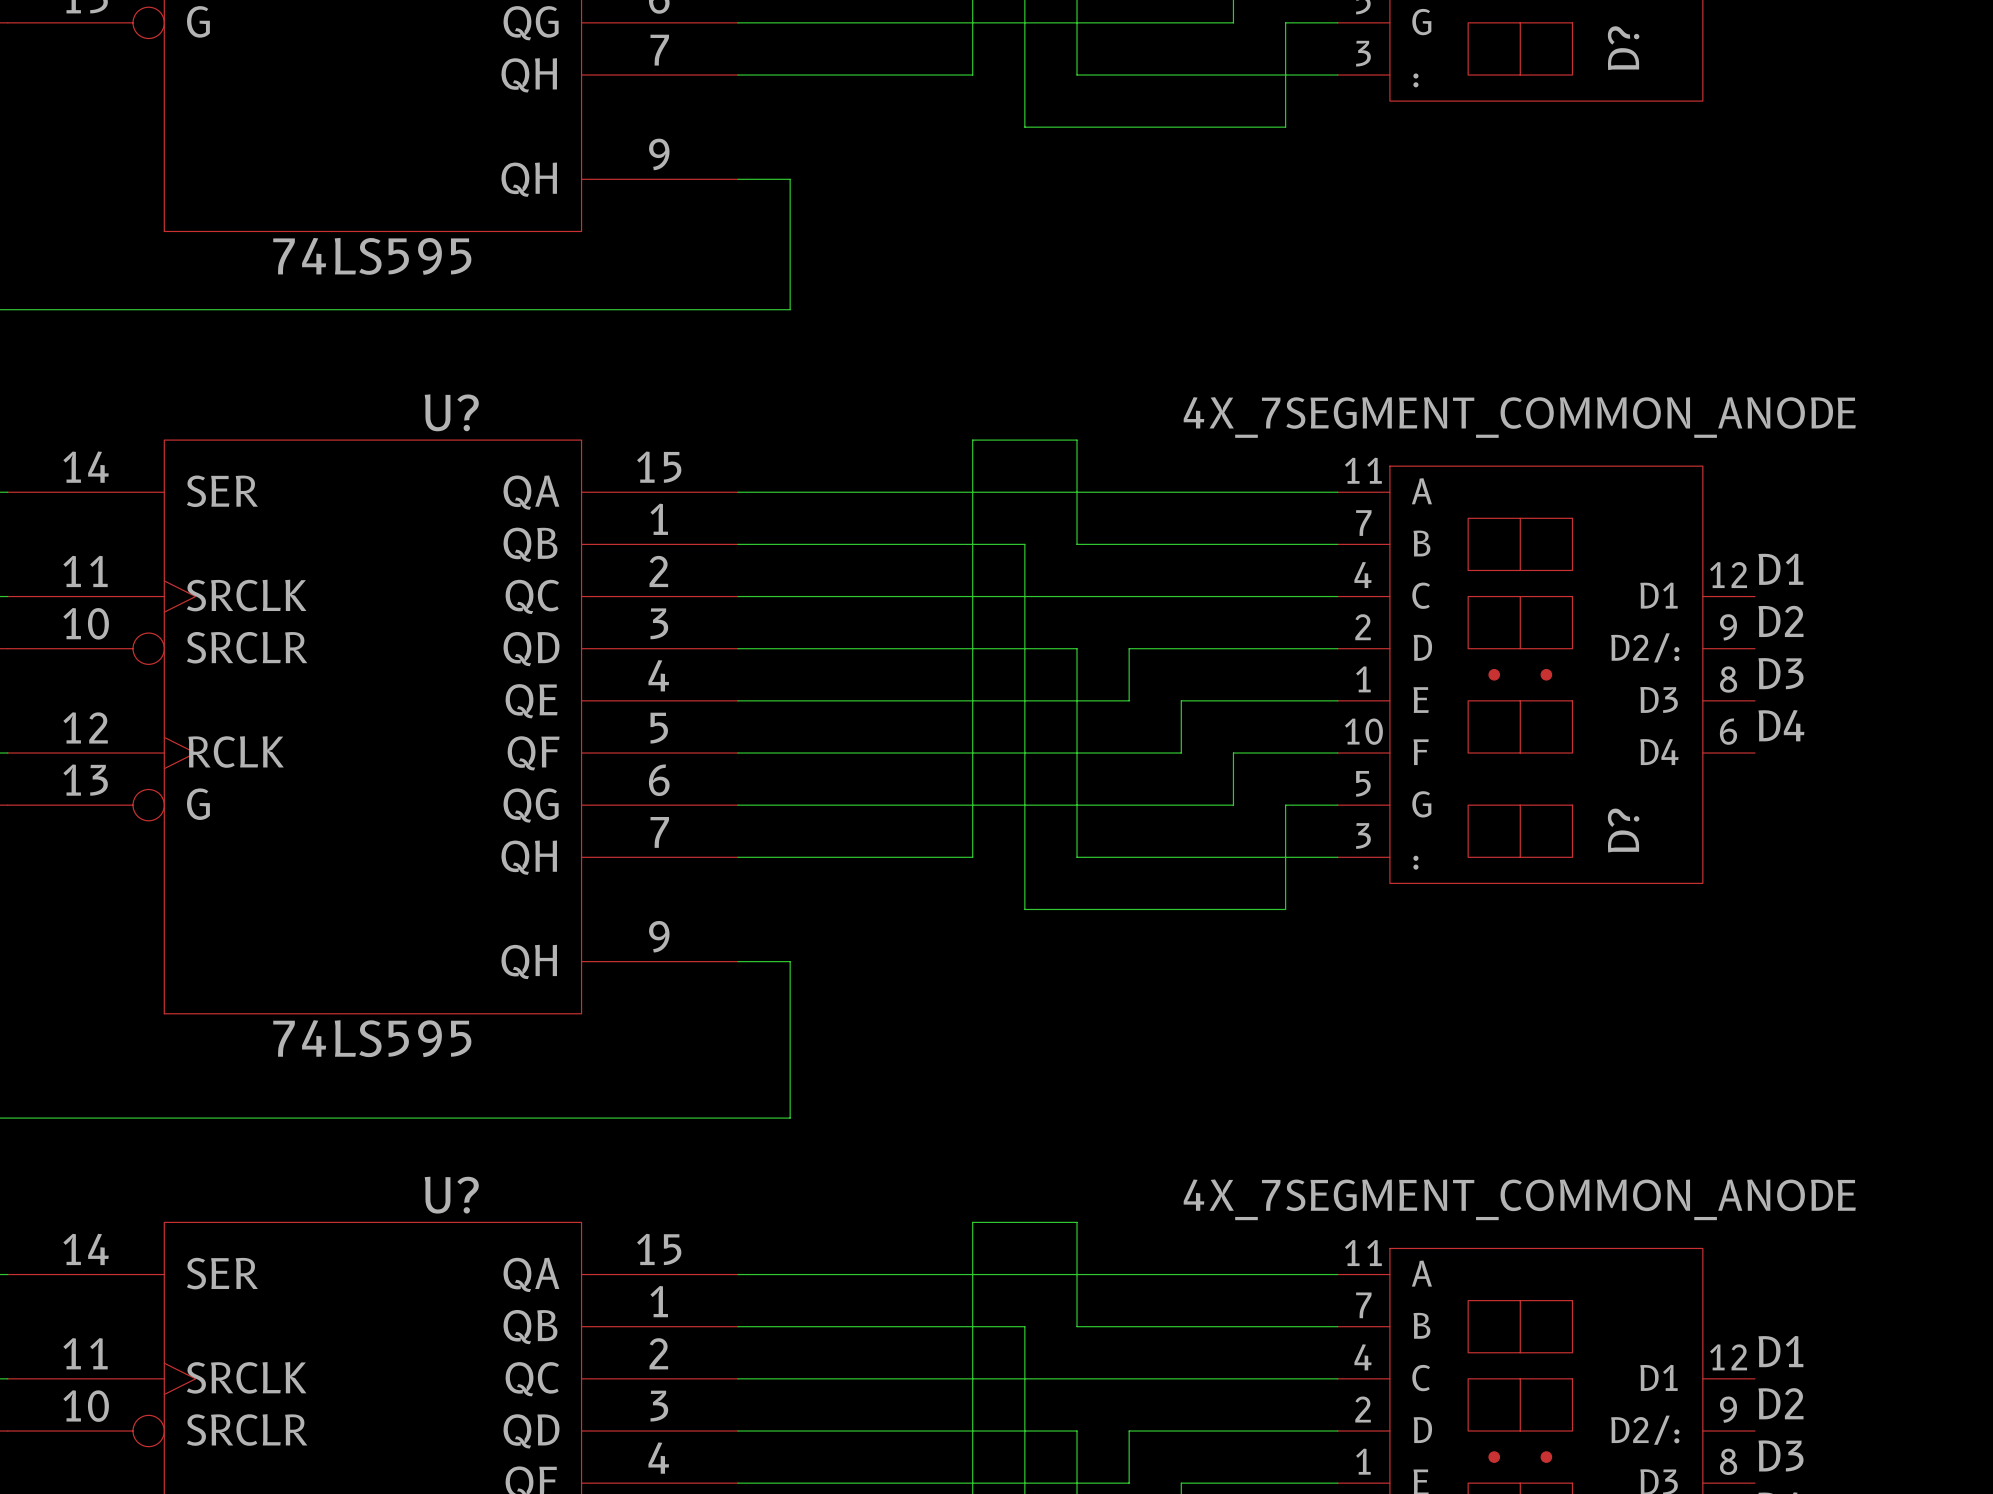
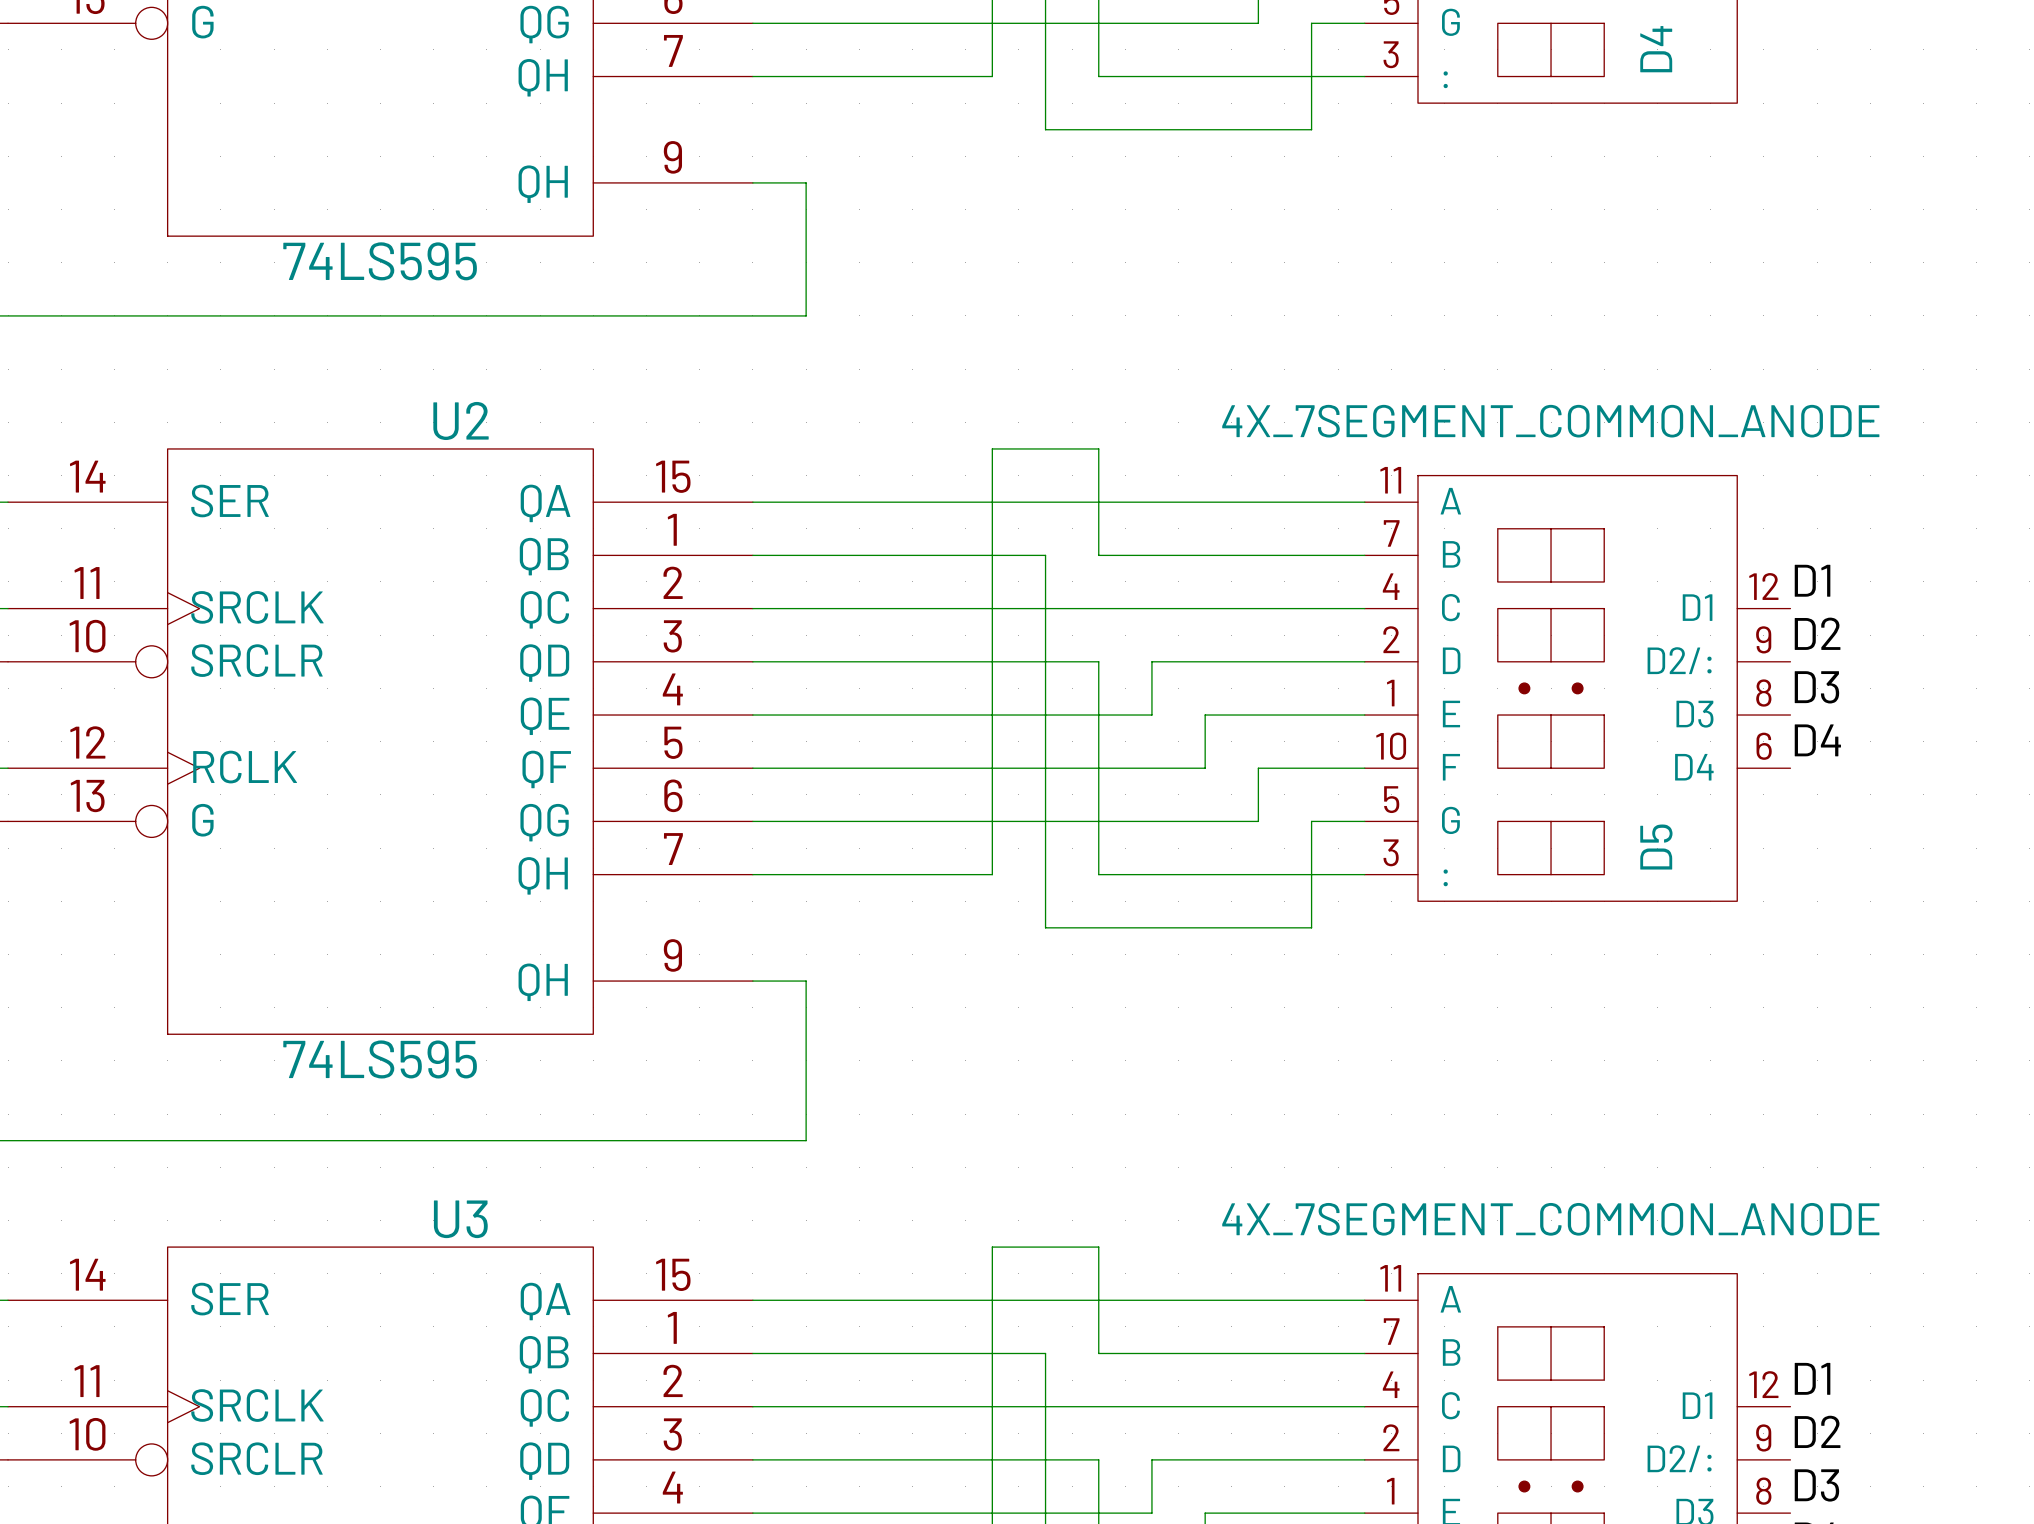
D? name: D? (1623, 48) -> D4 (1656, 49)
U? name: U? (451, 412) -> U2 (461, 420)
D? name: D? (1623, 830) -> D5 (1656, 847)
U? name: U? (451, 1195) -> U3 (460, 1219)

